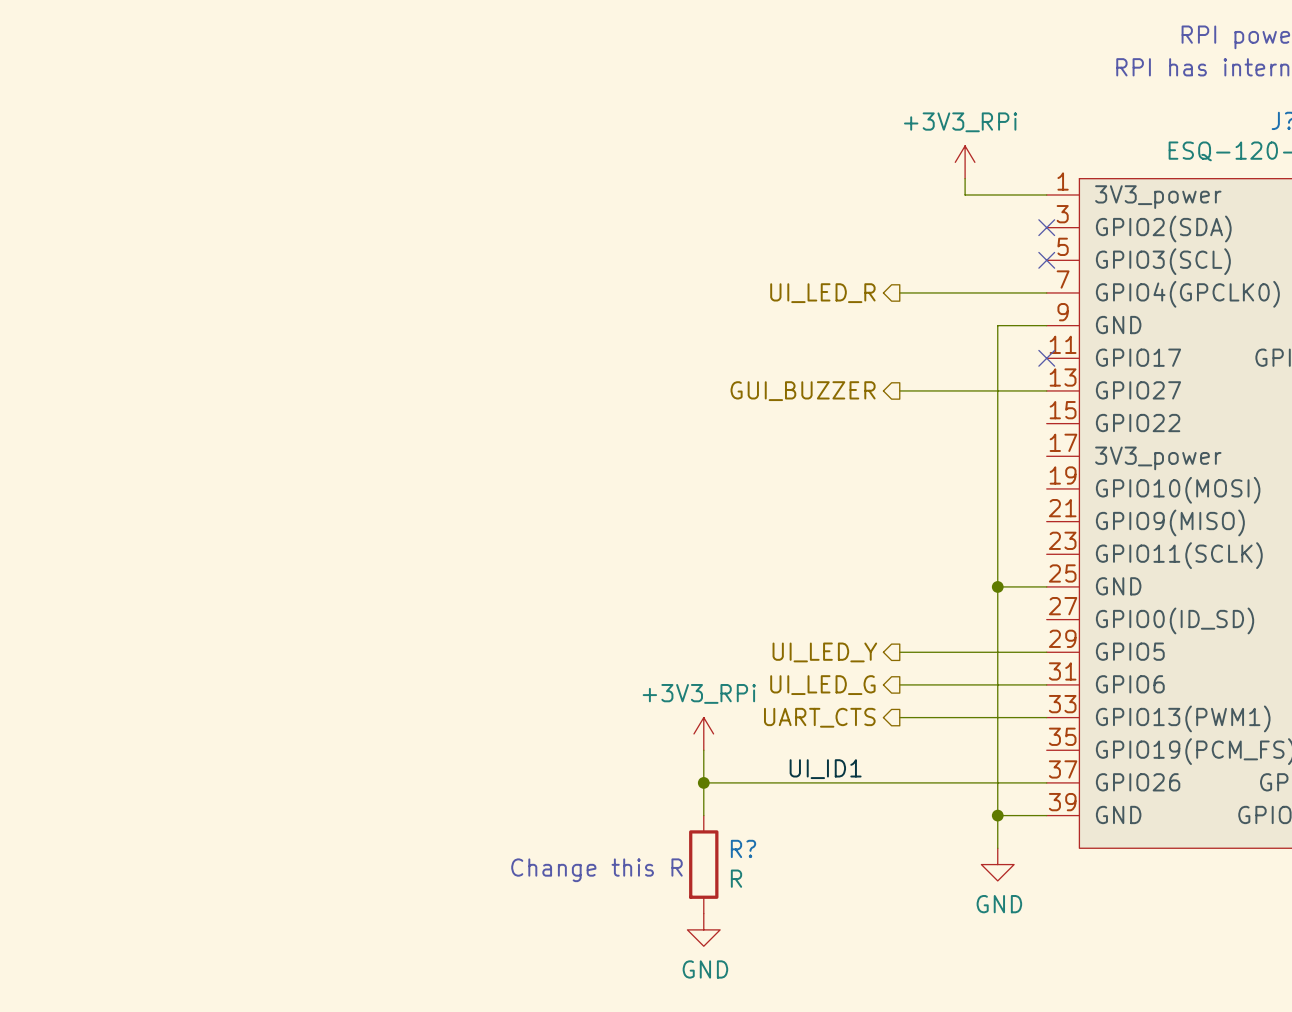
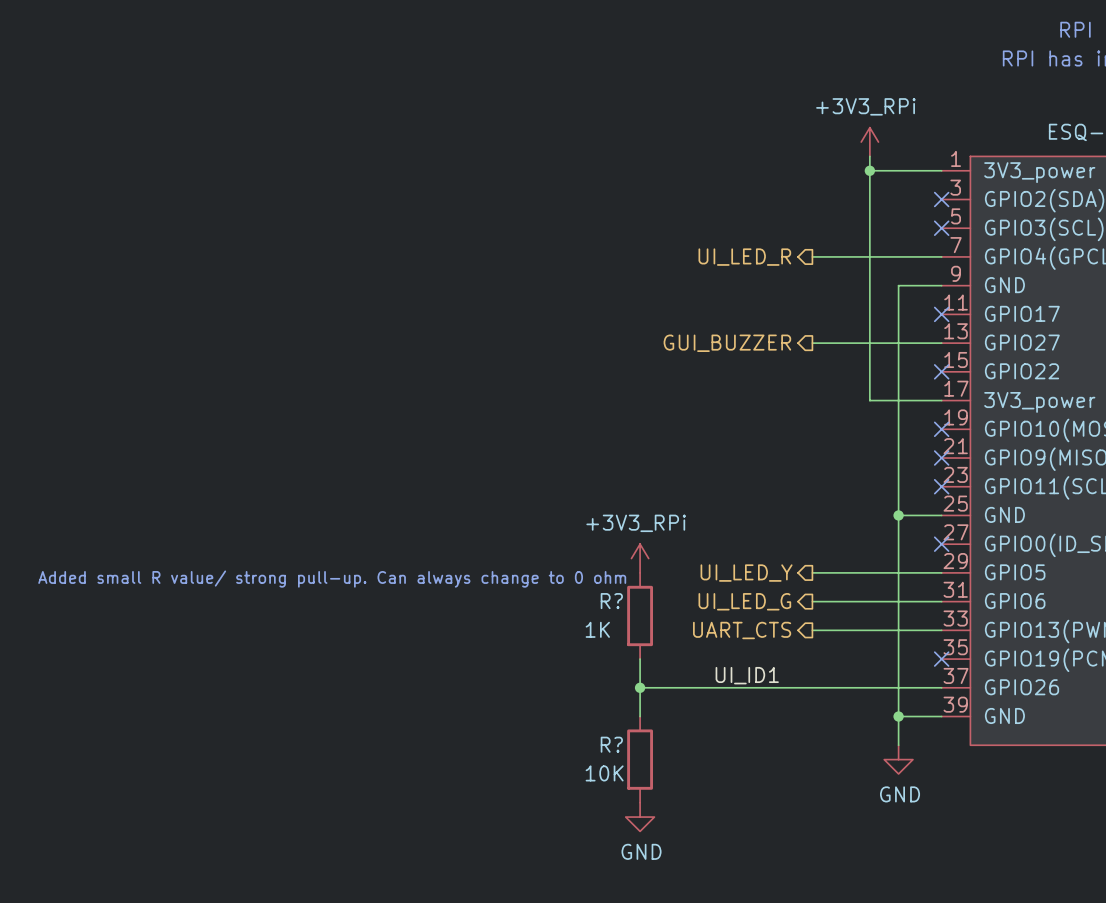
wire: none -> (869, 170) (869, 400) (941, 400)
junction: none -> (869, 170)
no-connect mark: none -> (941, 371)
no-connect mark: none -> (941, 429)
no-connect mark: none -> (941, 458)
no-connect mark: none -> (941, 486)
no-connect mark: none -> (941, 544)
text: none -> Added small R value/ strong pull-up. Can always change to 0 ohm (332, 579)
R?: none -> 1K (640, 615)
power symbol position: +3V3_RPi (703, 733) -> +3V3_RPi (640, 558)
no-connect mark: none -> (941, 659)
R? name position: R? (743, 848) -> R? (611, 744)
text: Change this R (596, 870) -> none
R? value: R (736, 878) -> 10K (604, 773)

